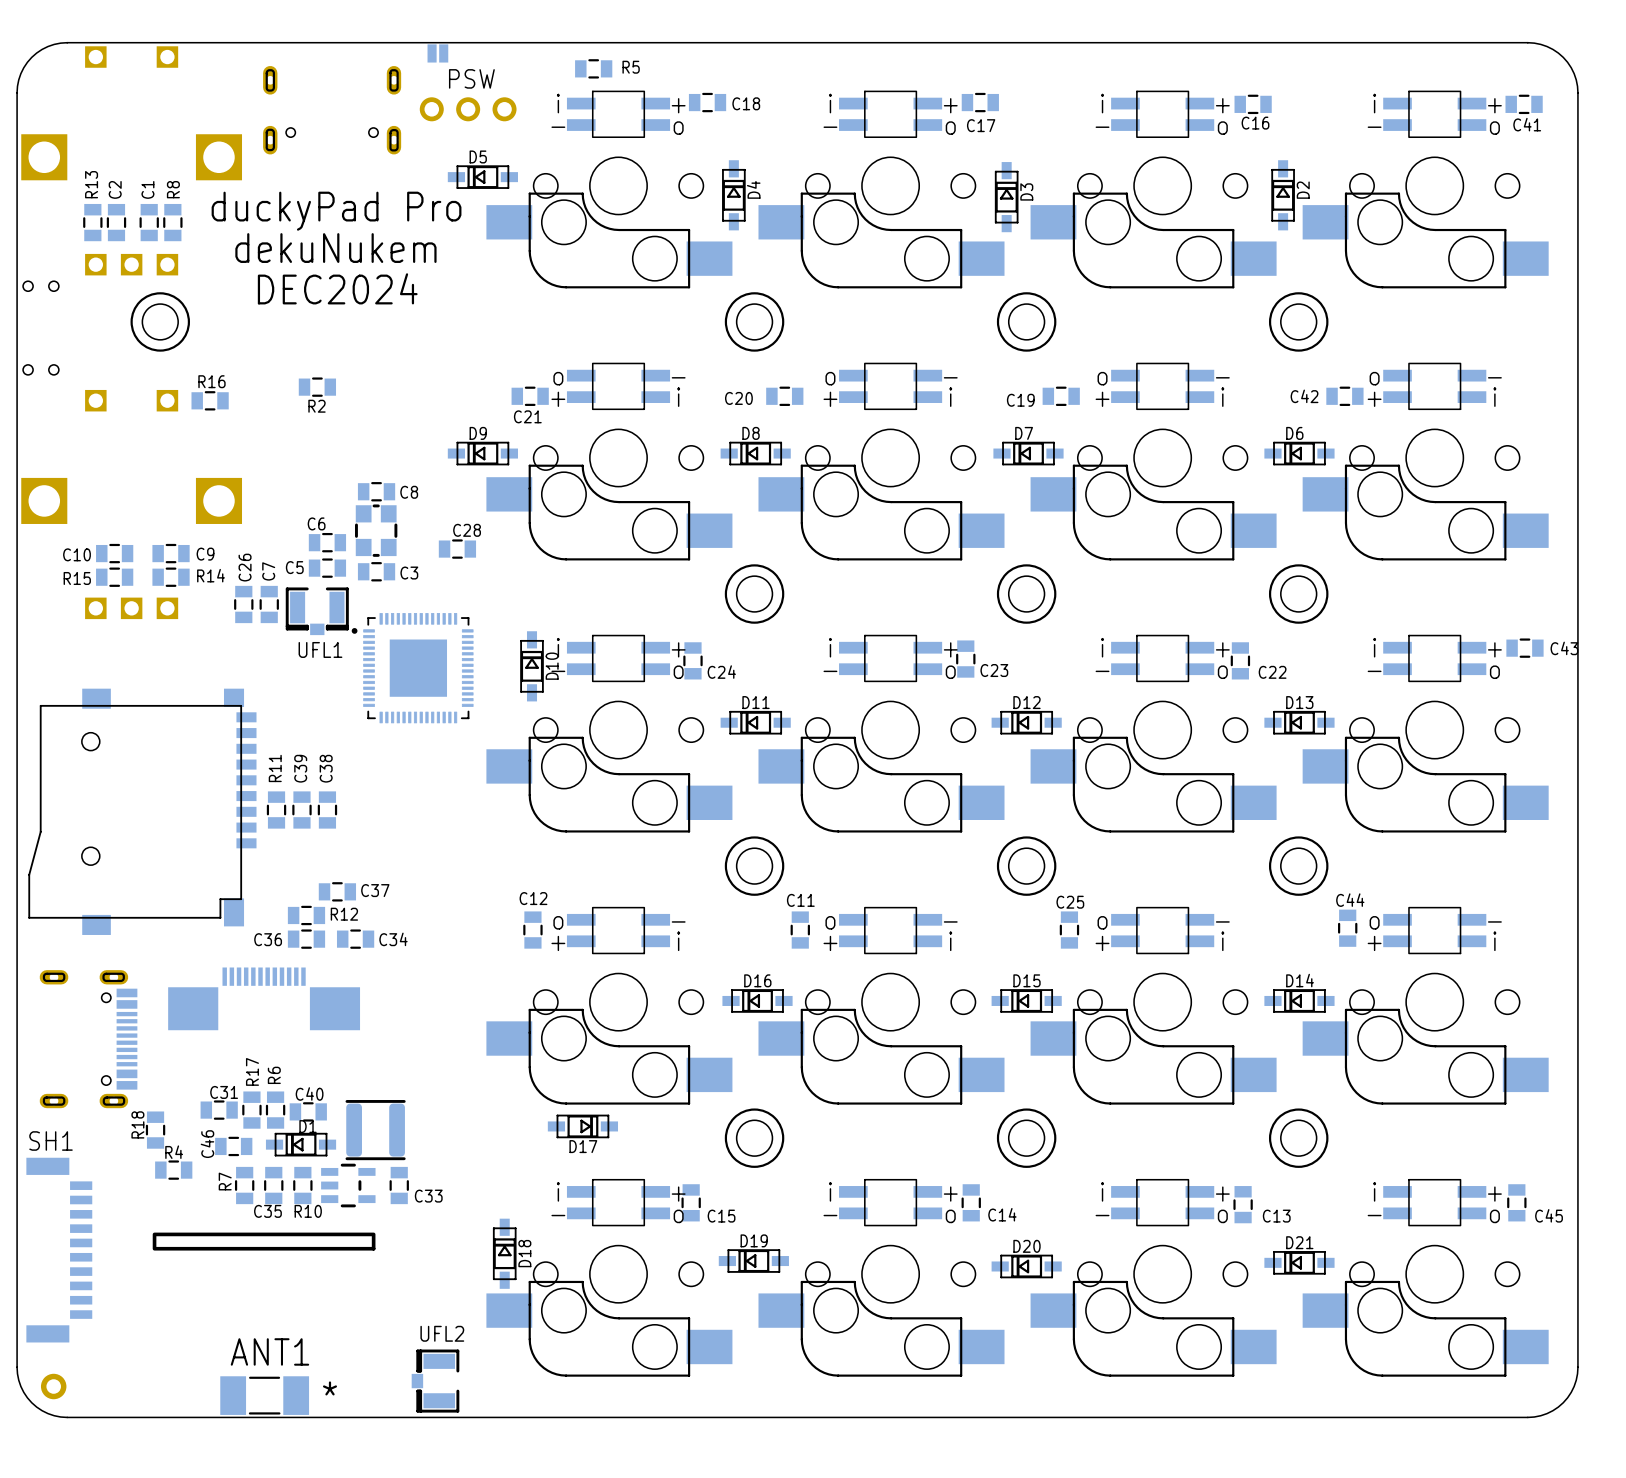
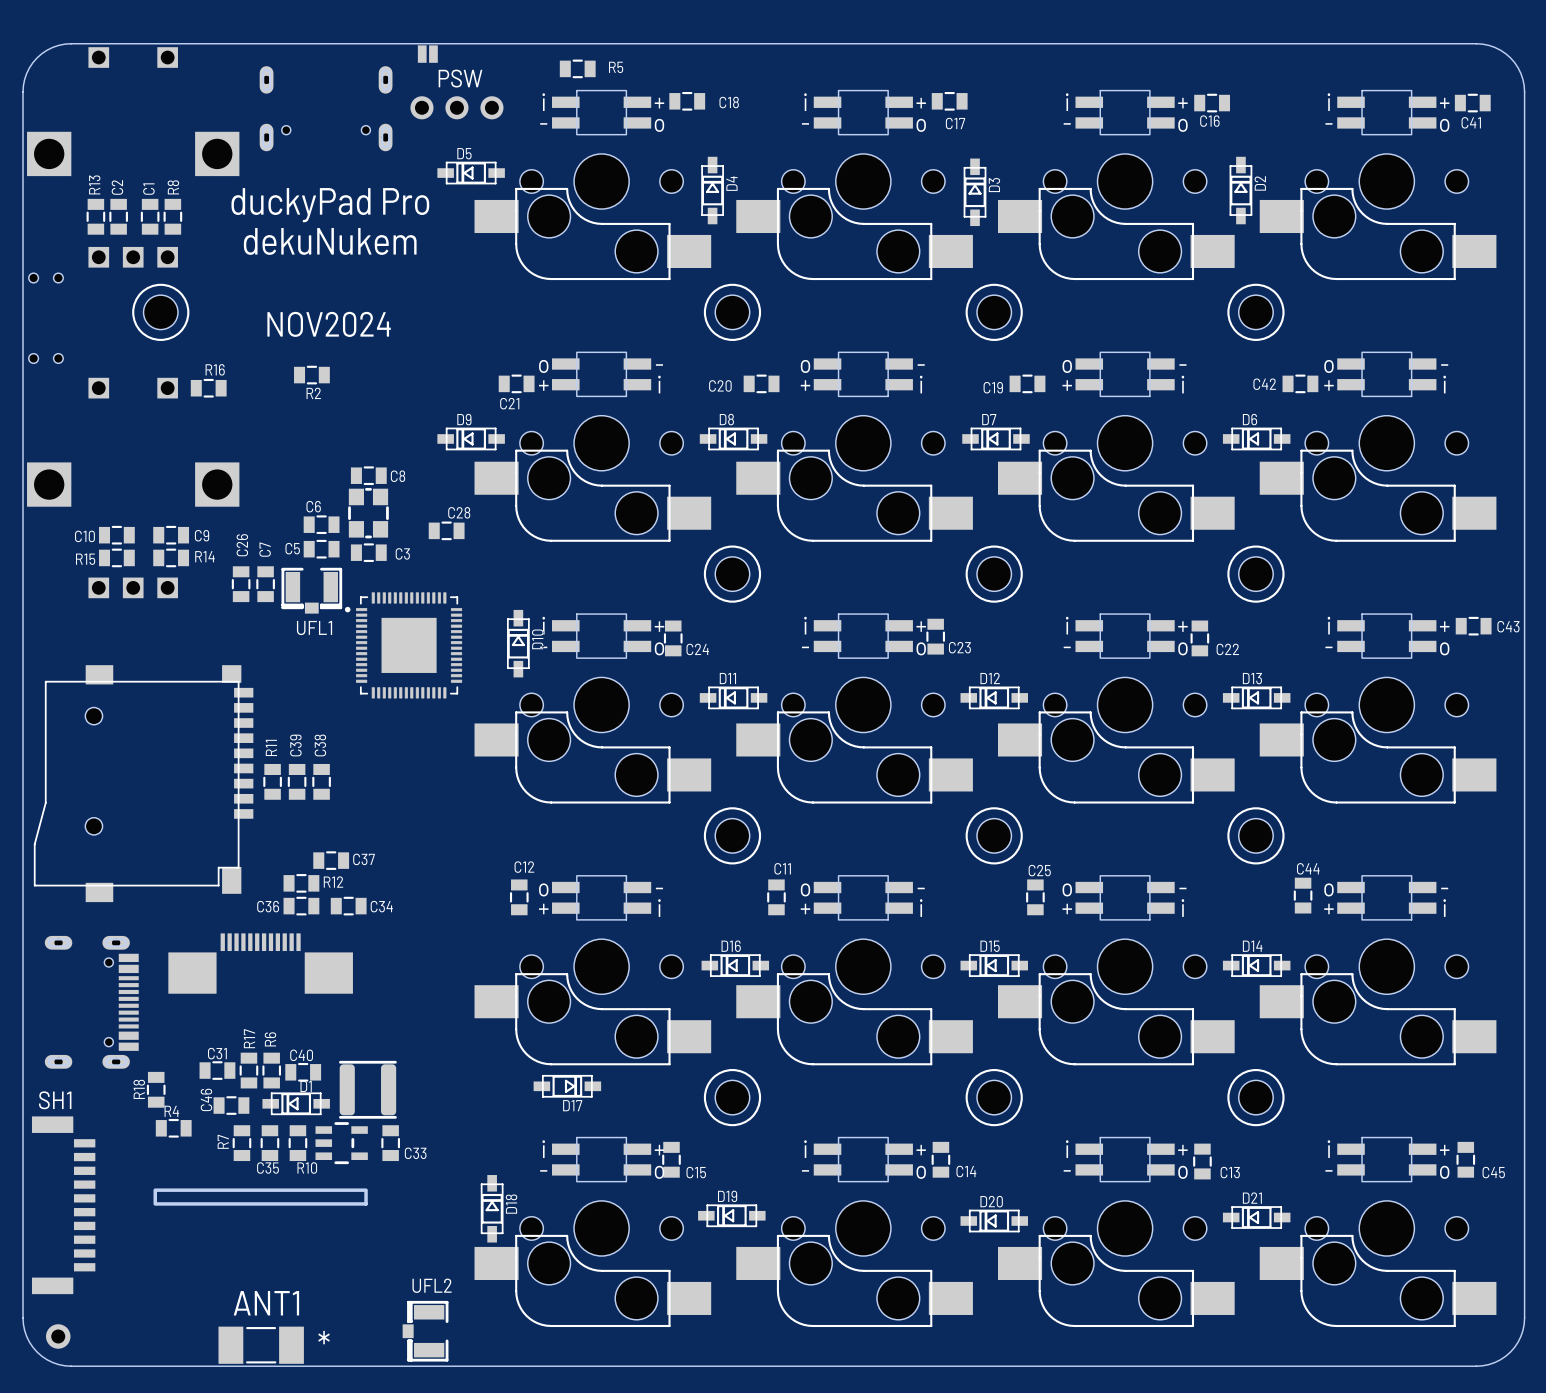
text: DEC2024 (337, 288) -> none
text: none -> NOV2024 (329, 324)

